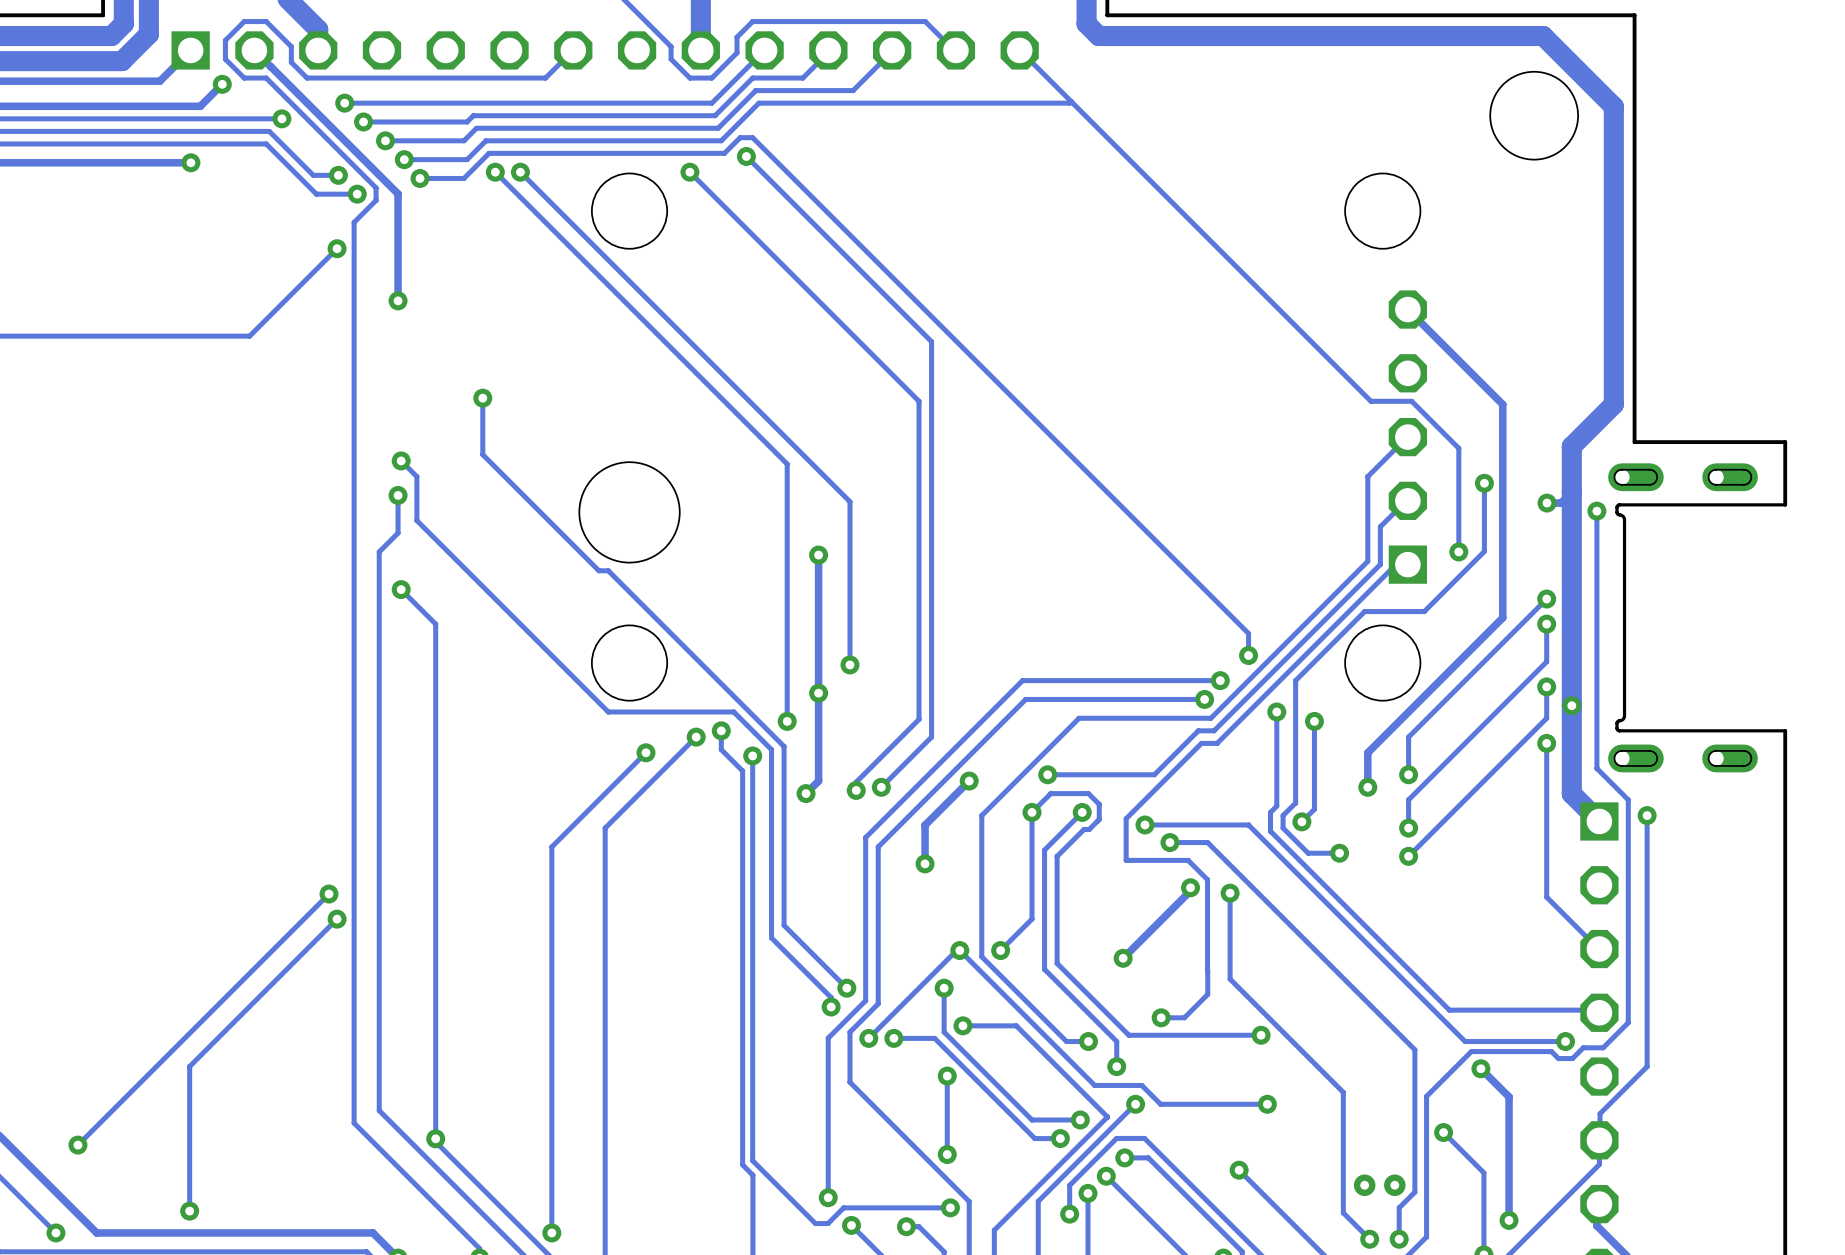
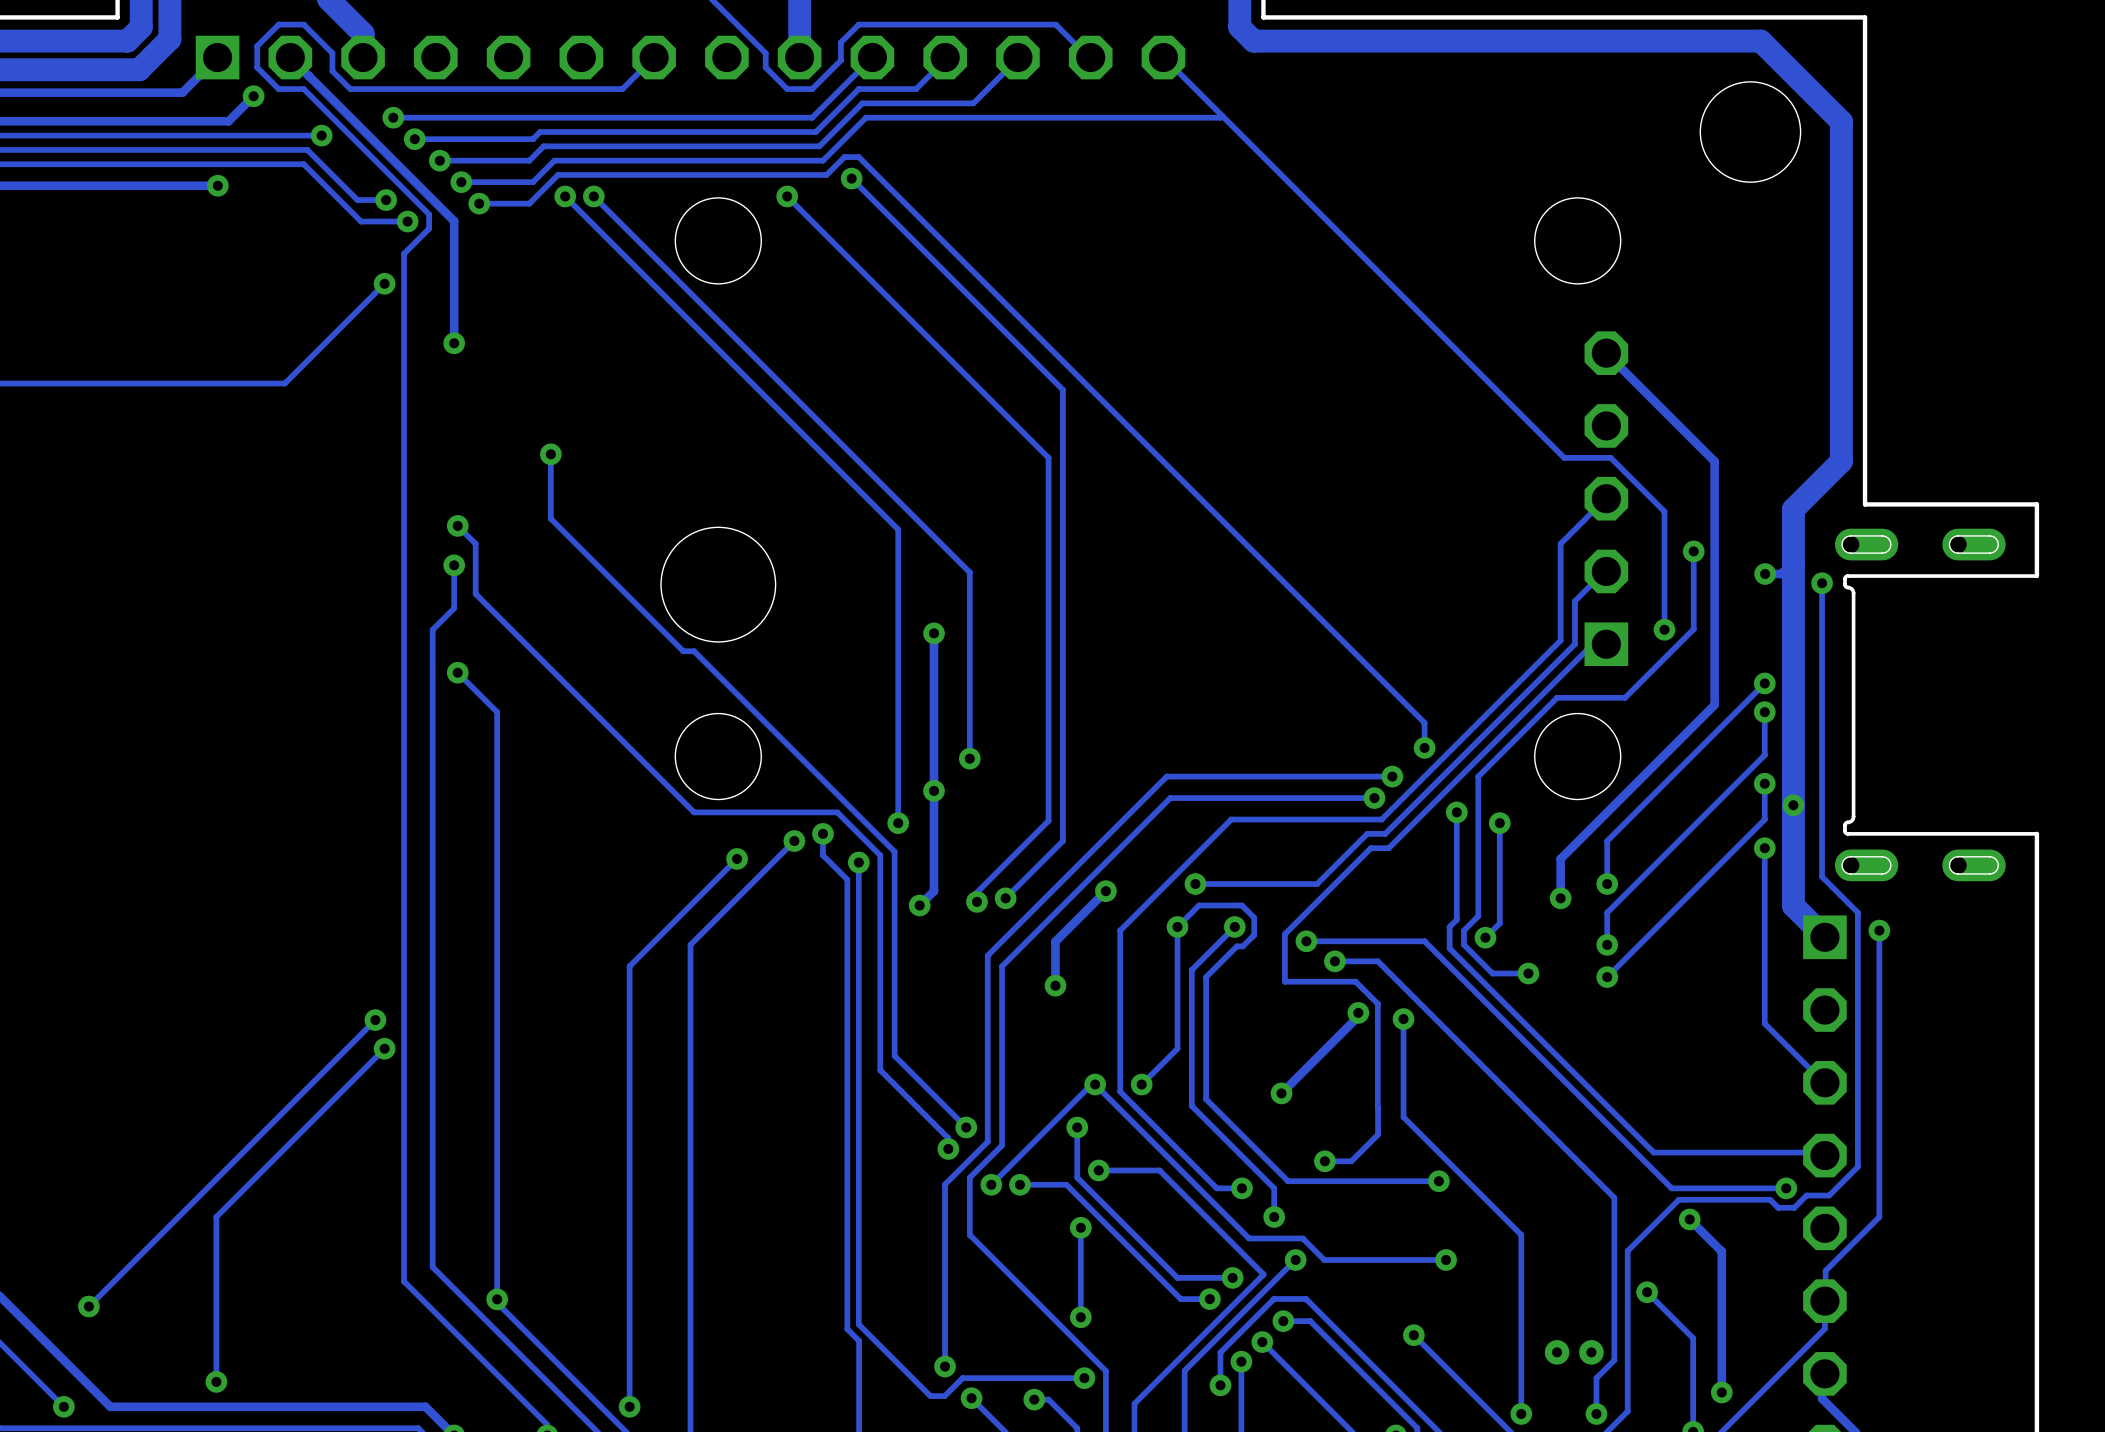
track: (1333, 1082) (1343, 1092) (1343, 1212) (1369, 1239) -> (1521, 1234) (1521, 1413)
via position: (1369, 1239) -> (1521, 1413)

